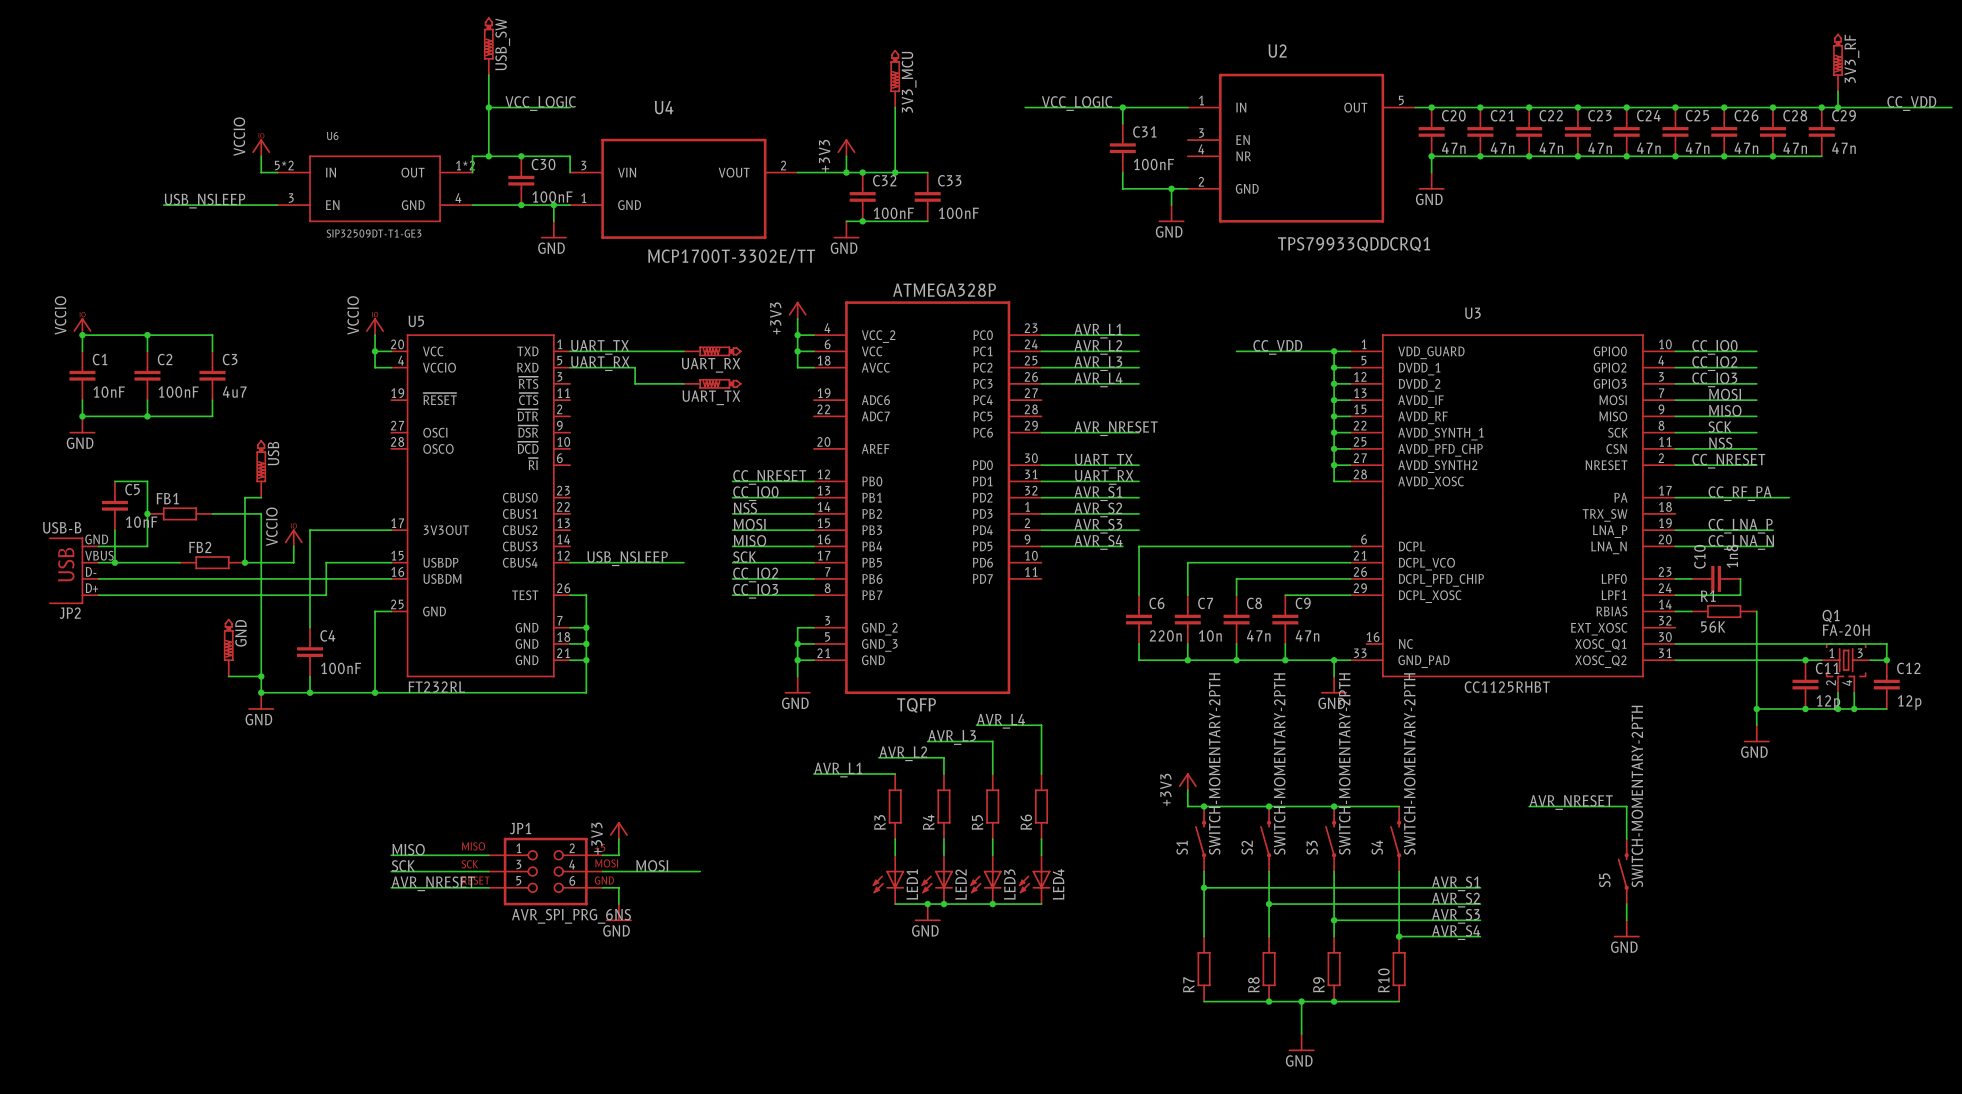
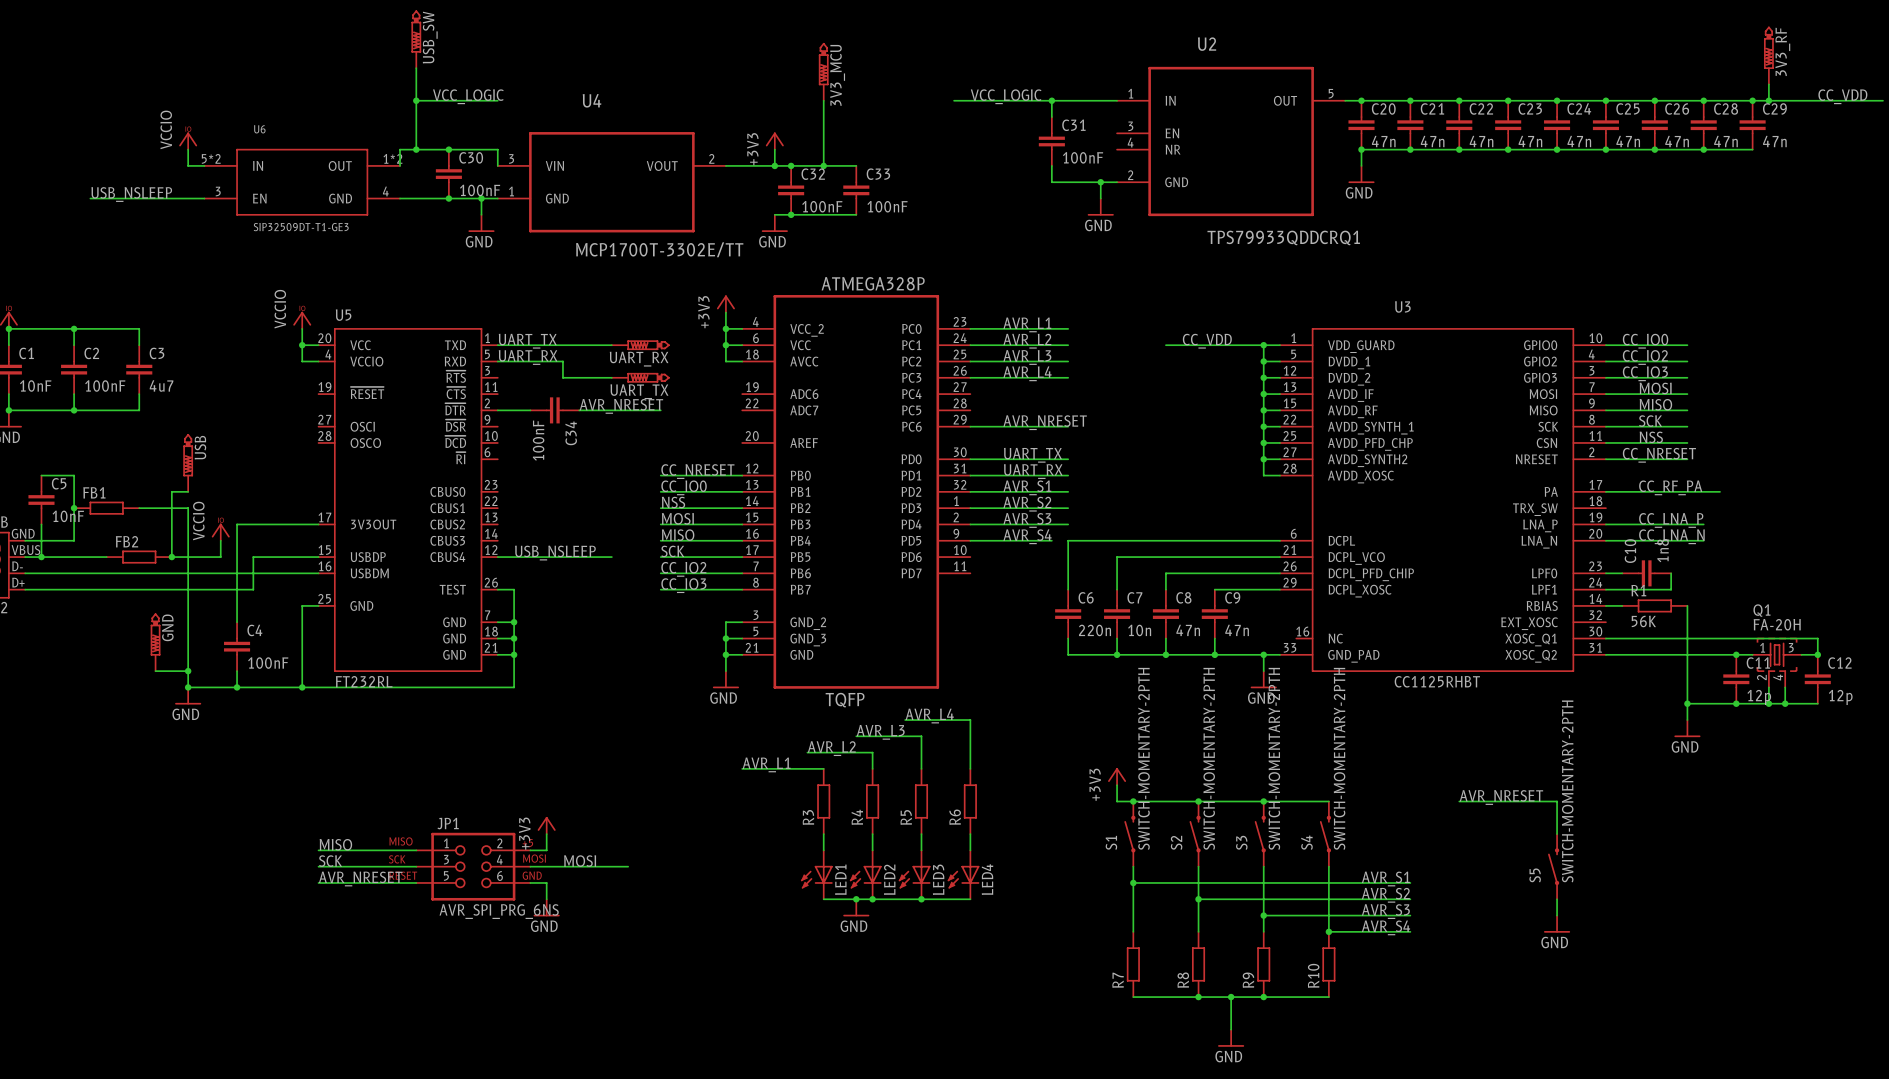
label: none -> AVR_NRESET (621, 406)
wire: none -> (497, 410) (530, 410)
C34: none -> 100nF (554, 410)
wire: none -> (579, 410) (660, 410)

